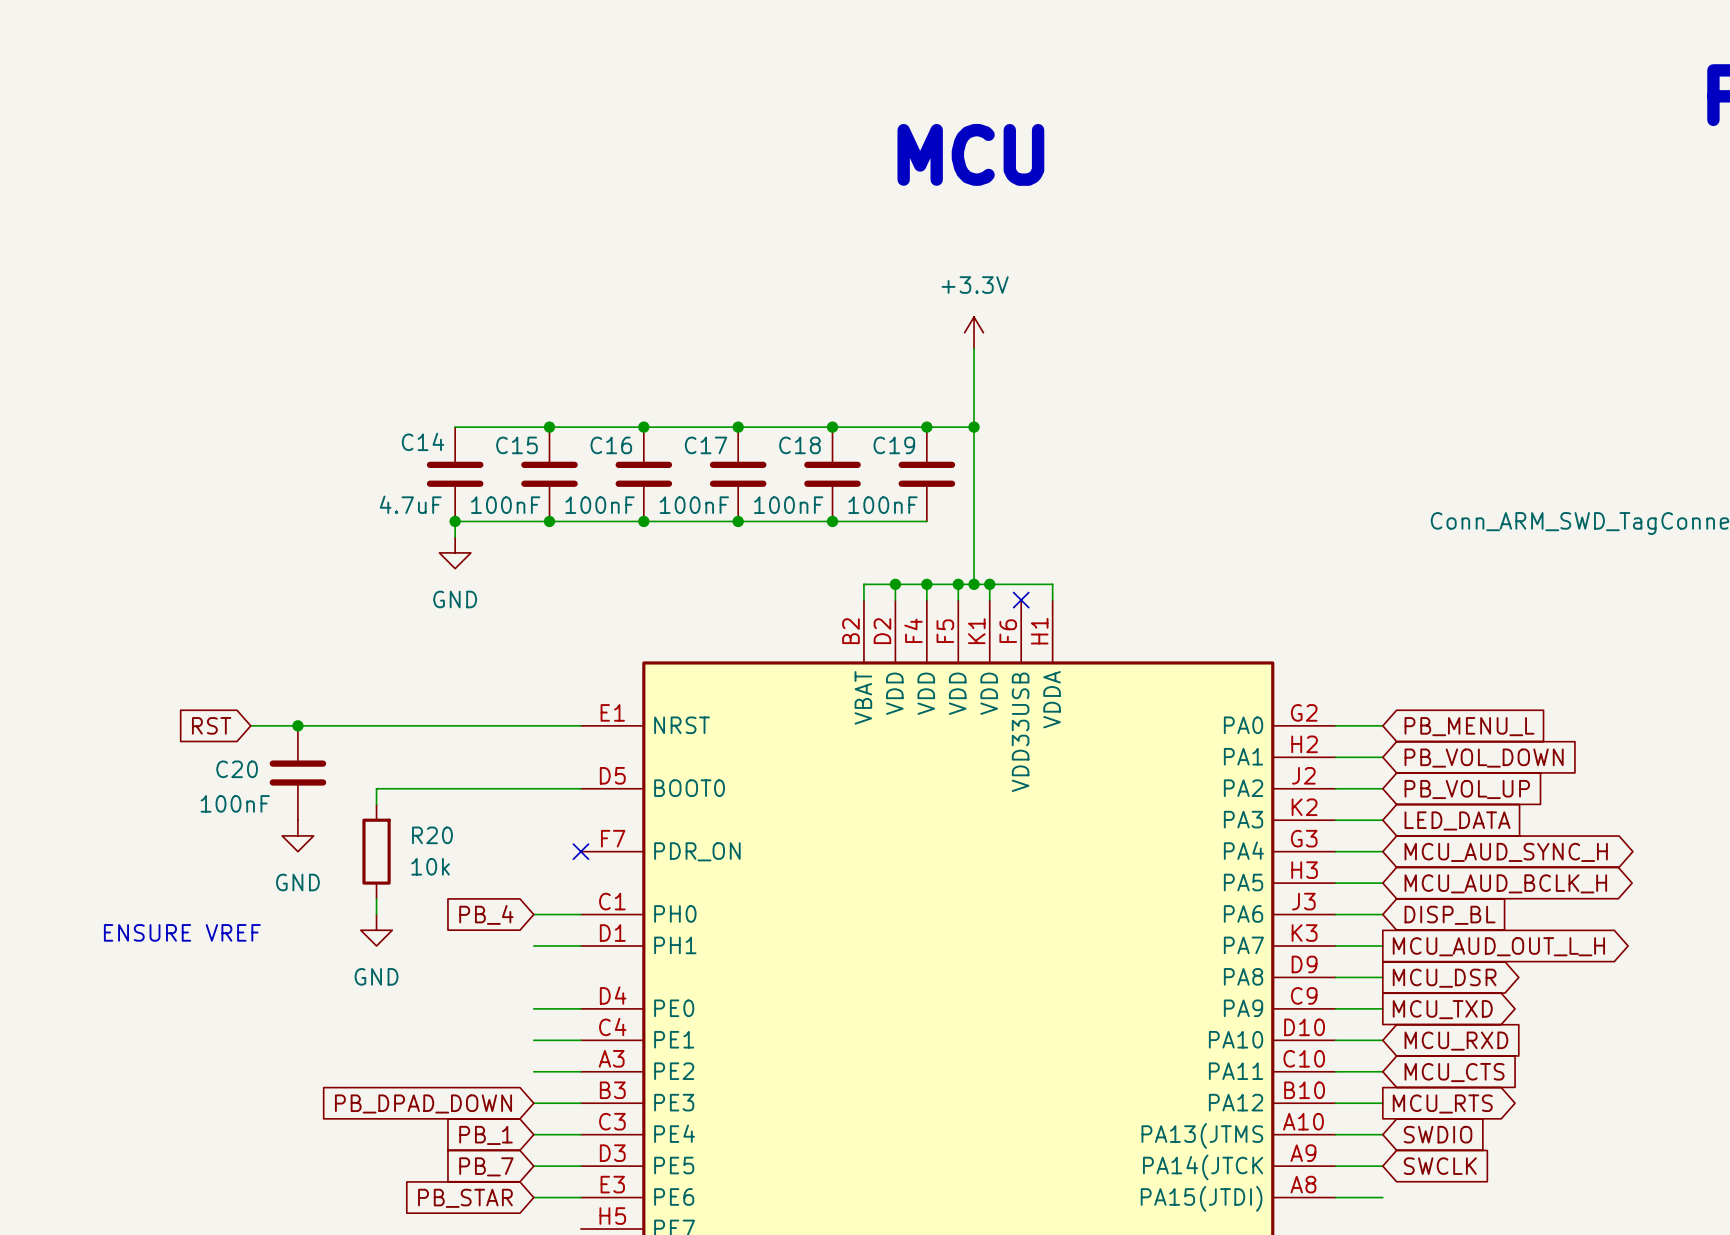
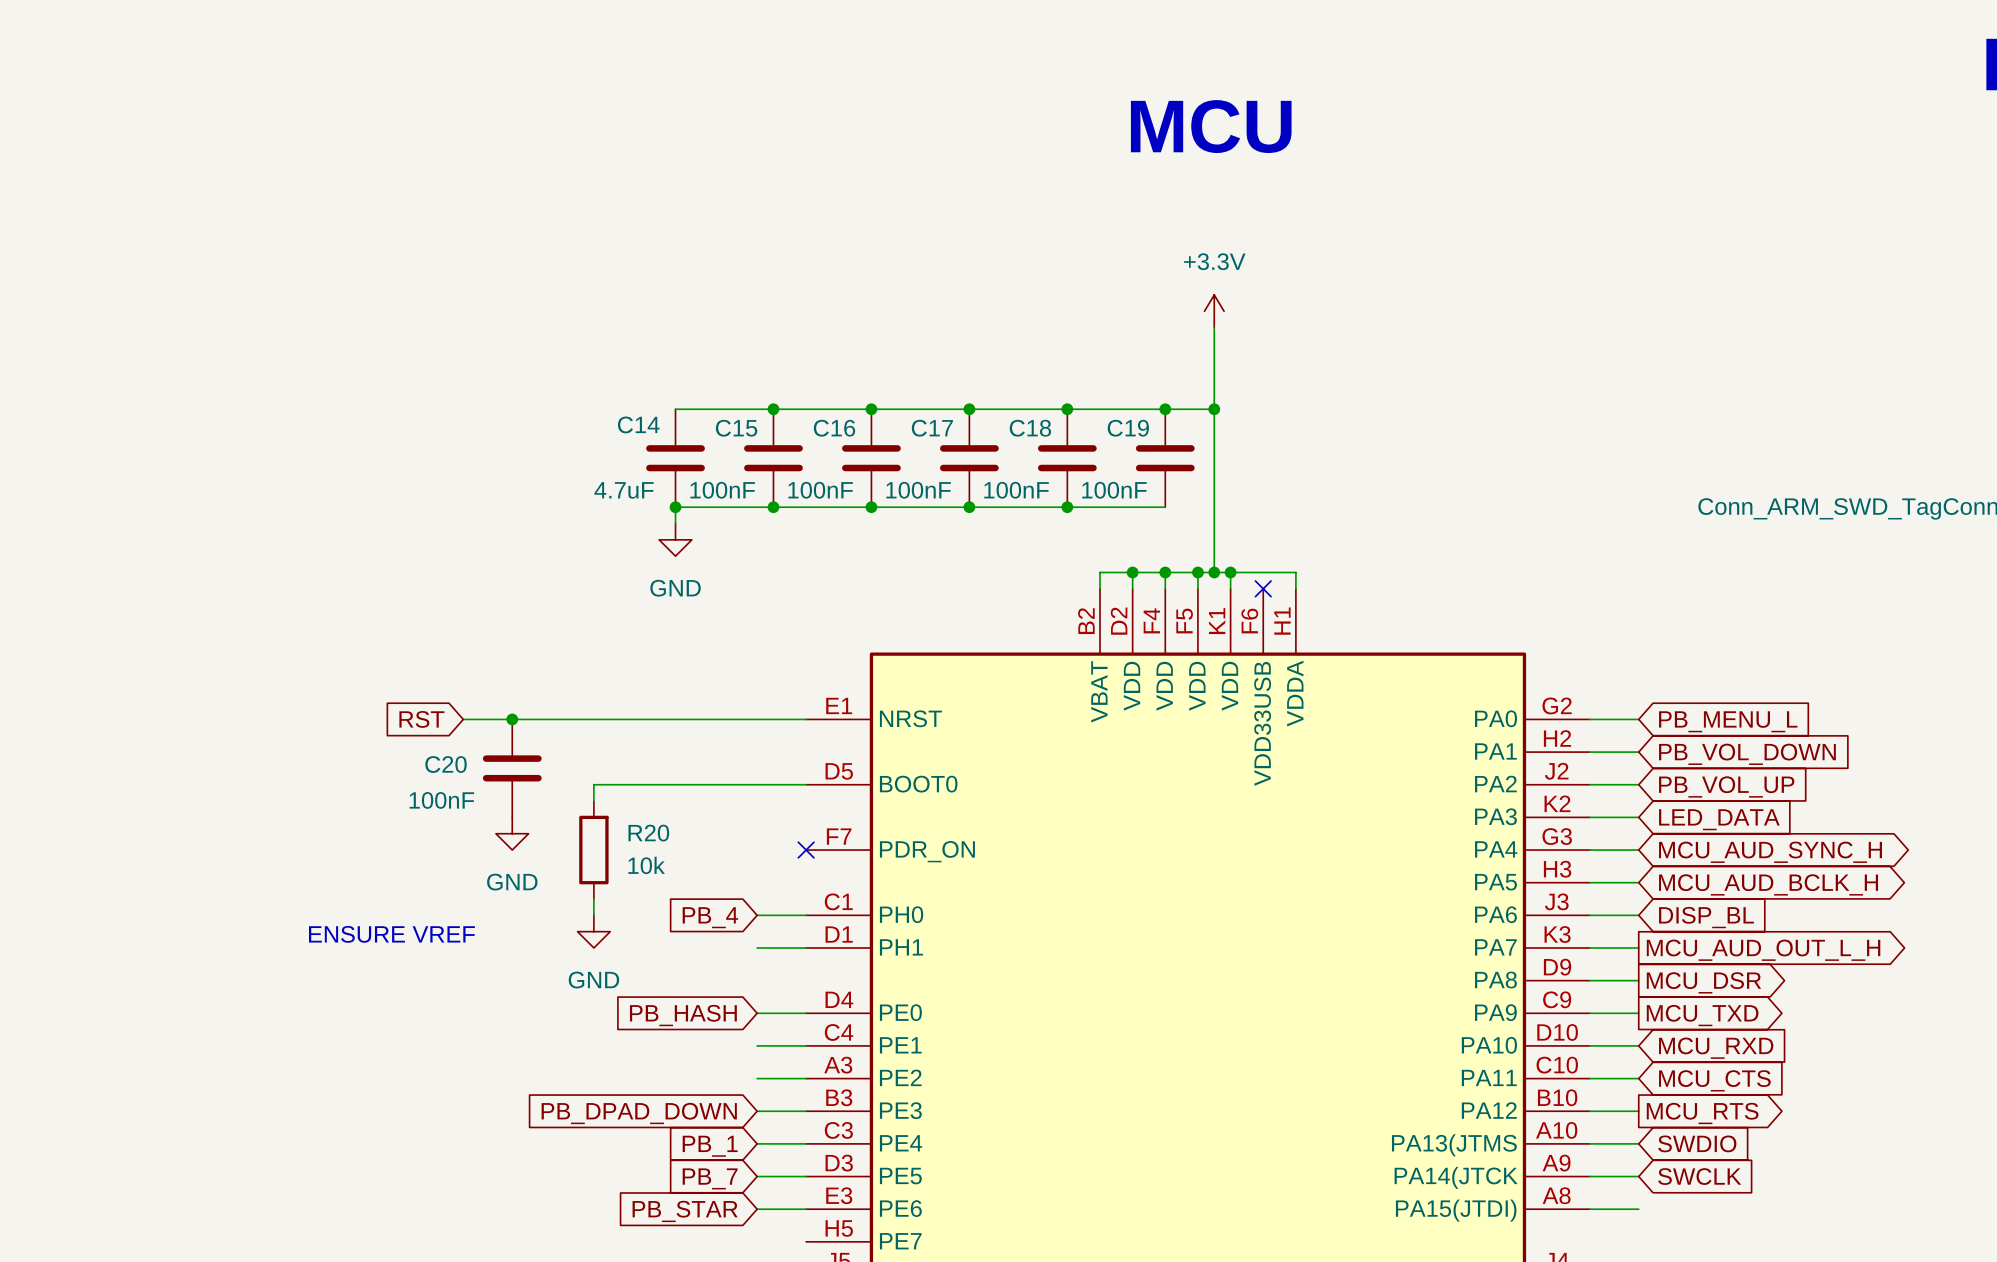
global label: none -> PB_HASH (683, 1015)

